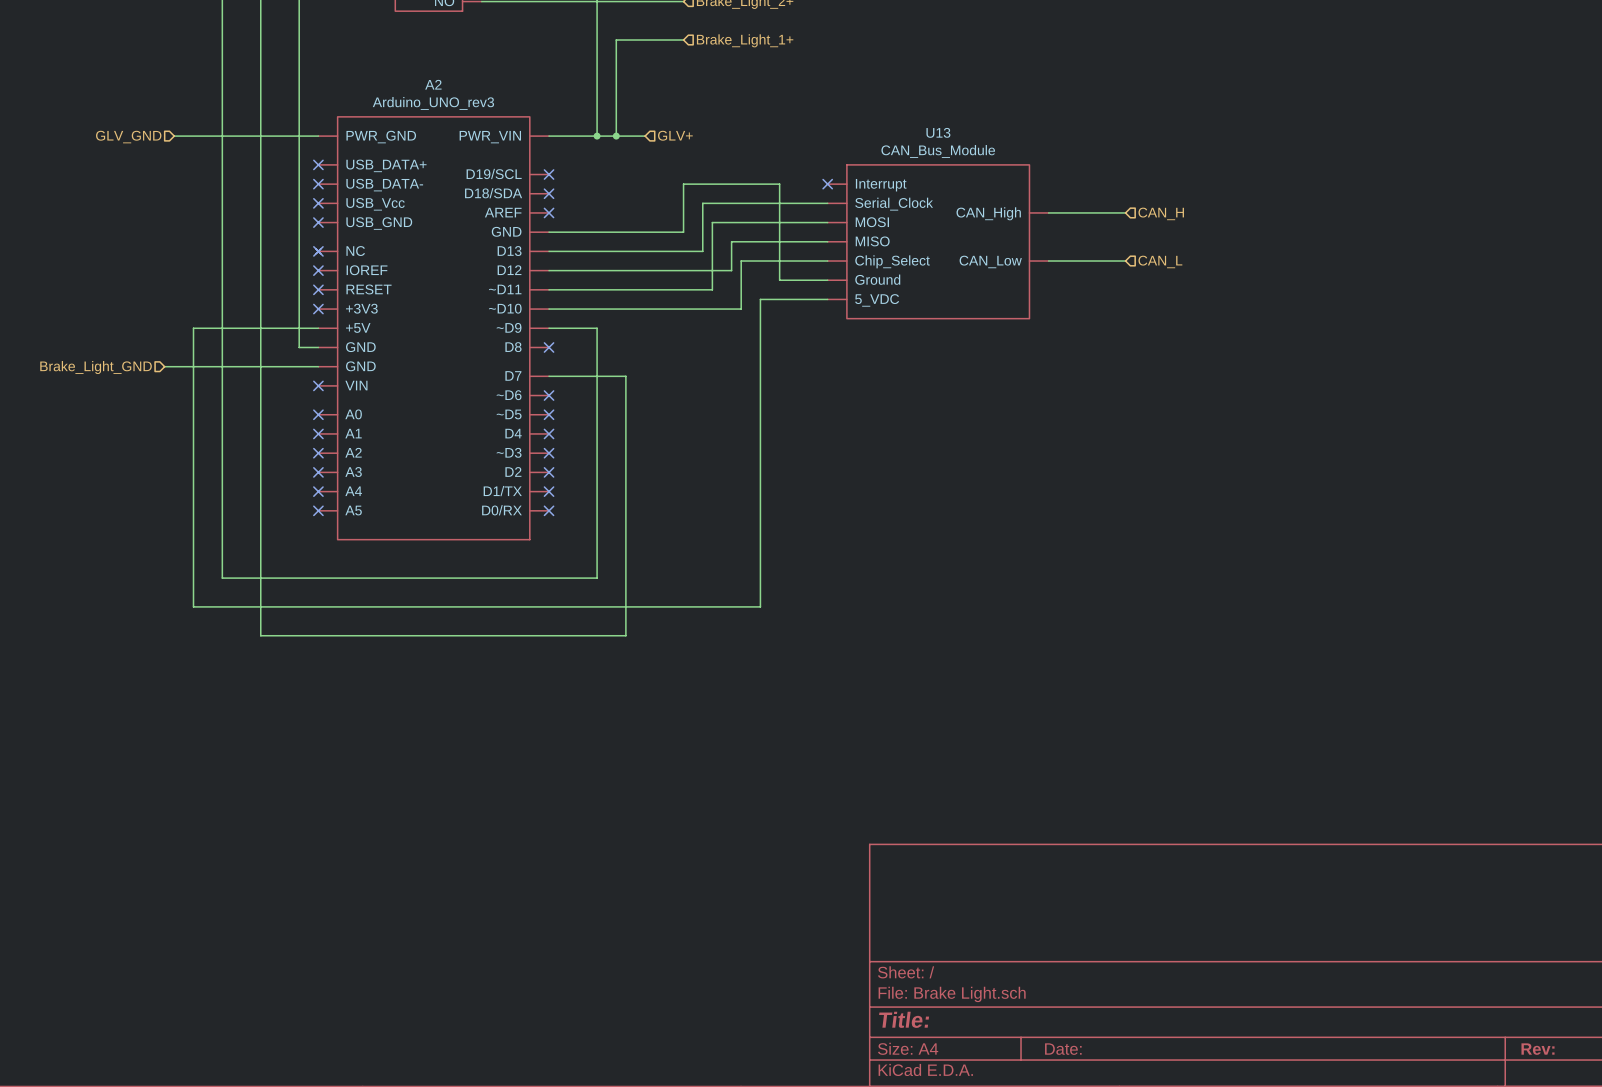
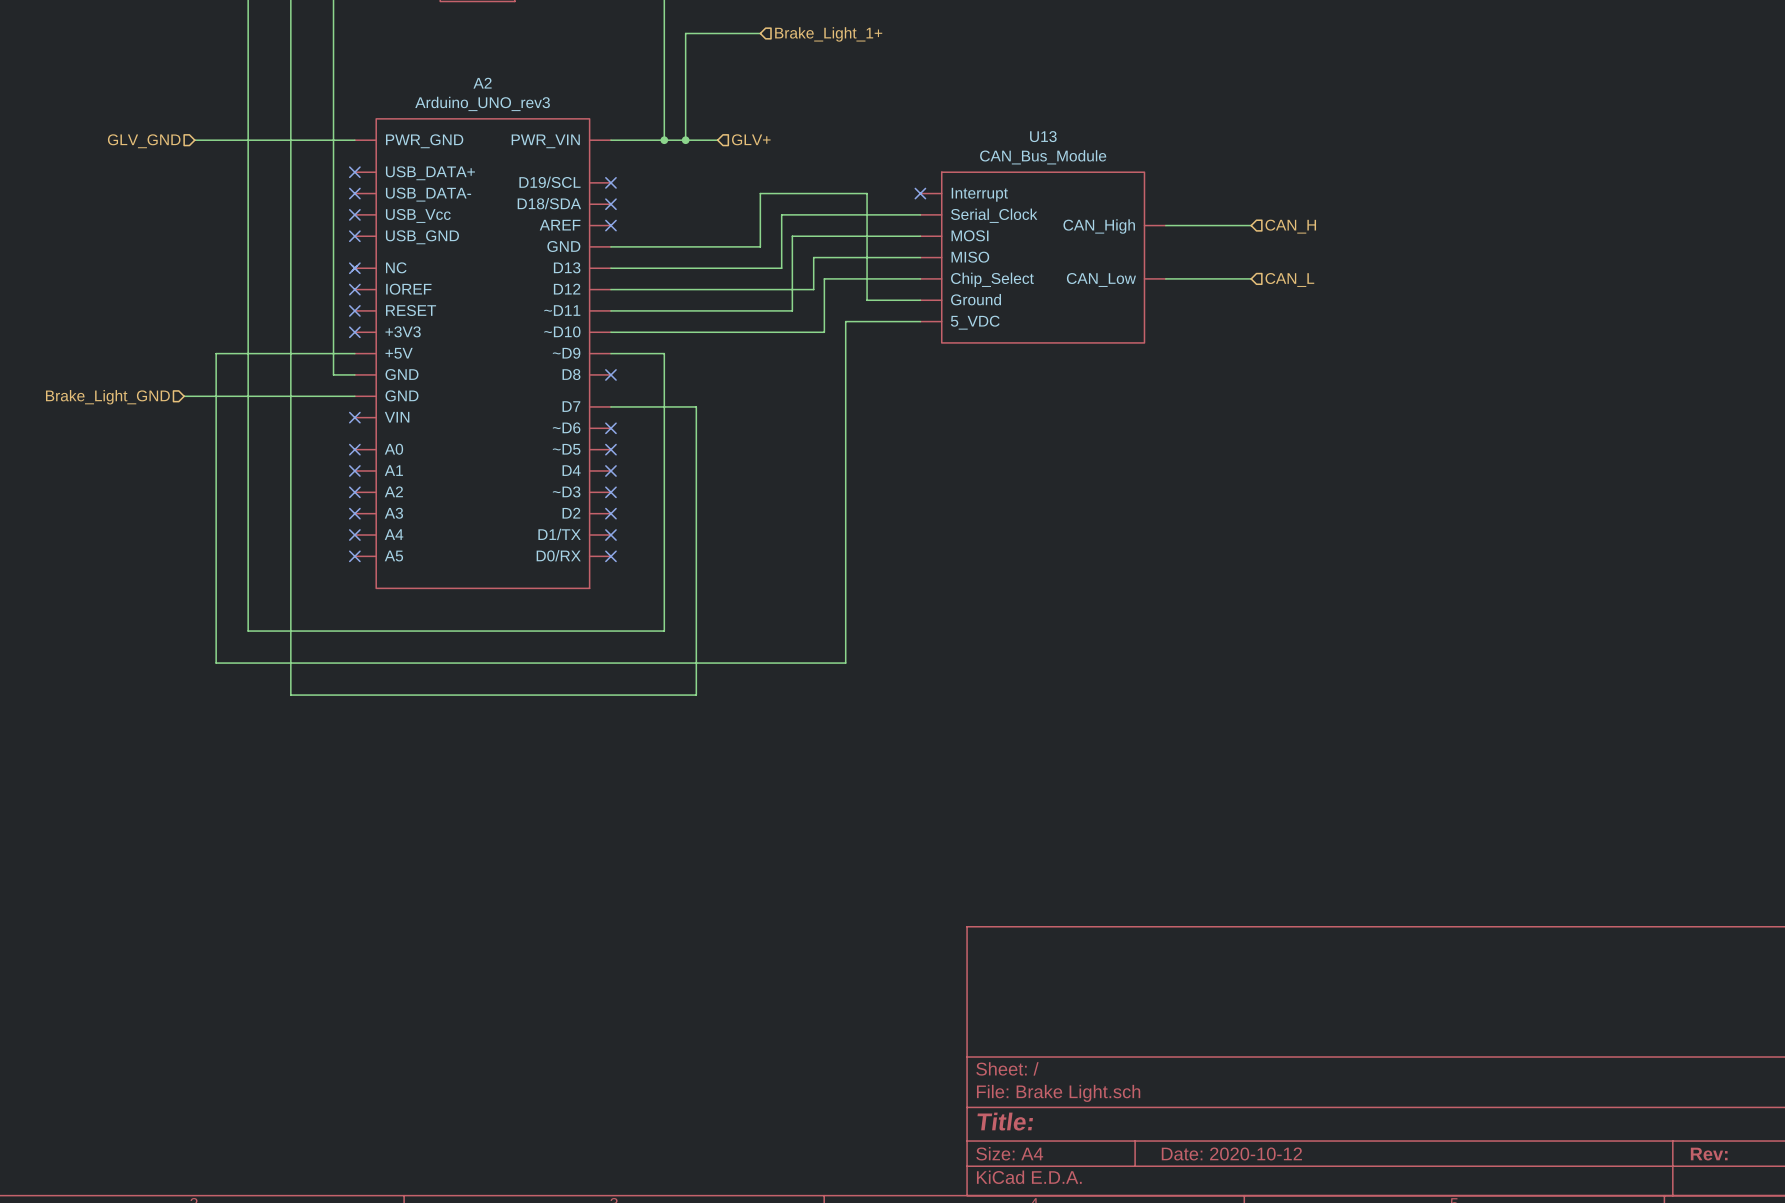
title block: Date: (1063, 1049) -> Date: 2020-10-12 (1231, 1153)

